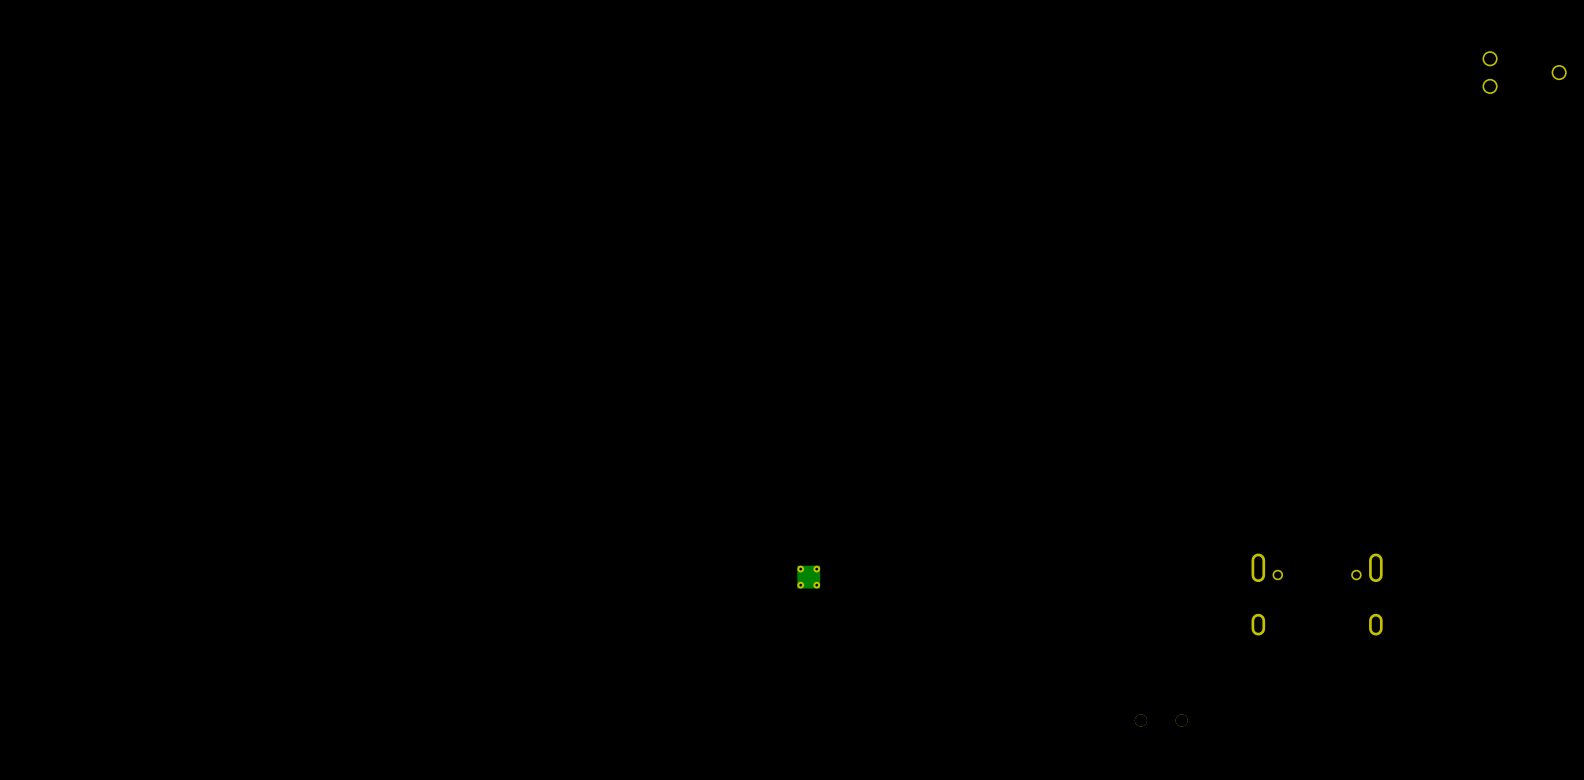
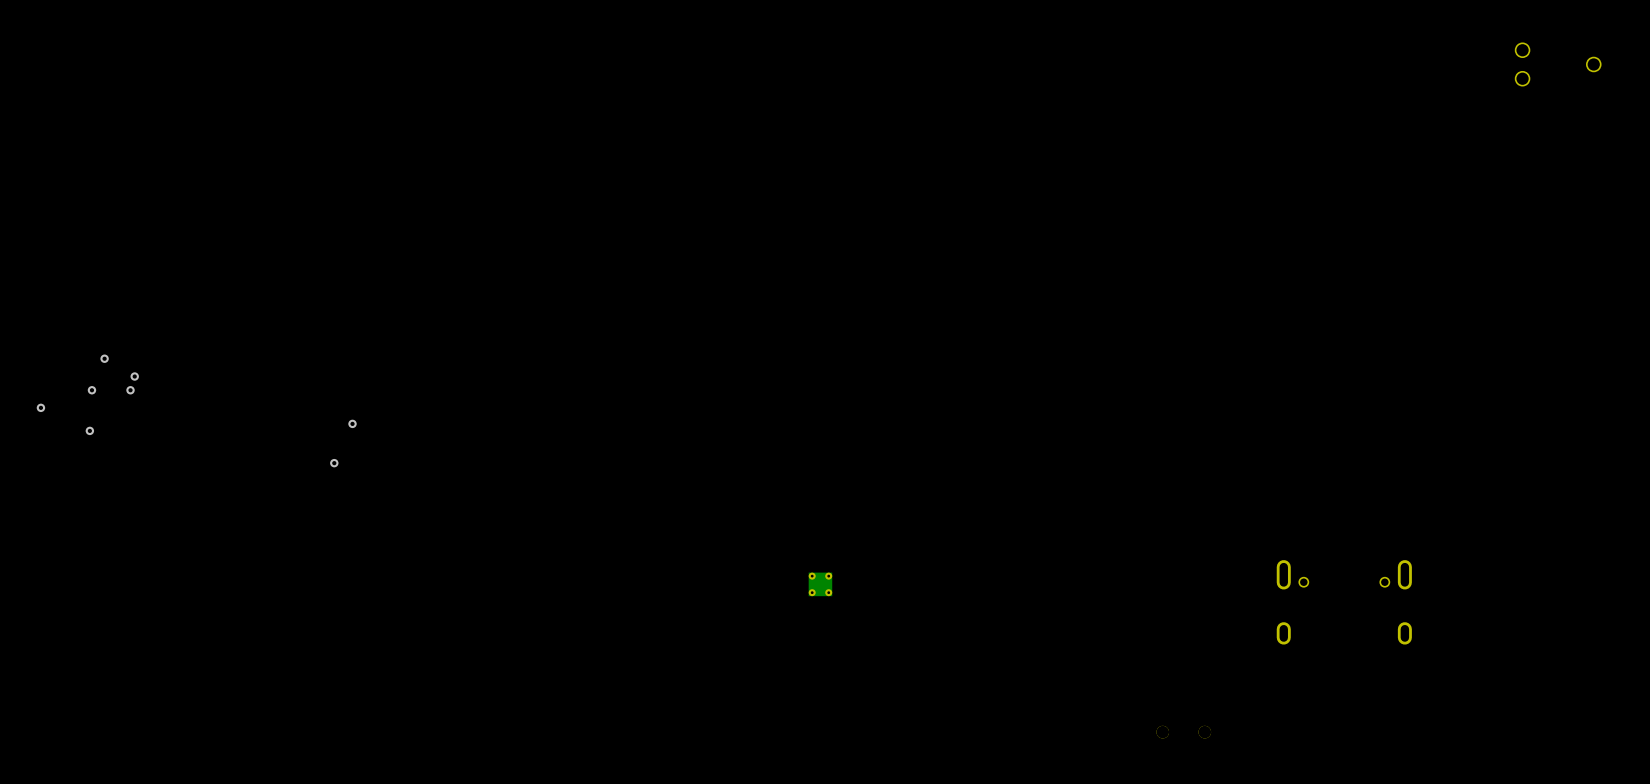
via: none -> (104, 358)
via: none -> (134, 376)
via: none -> (91, 390)
via: none -> (130, 390)
via: none -> (40, 407)
via: none -> (352, 423)
via: none -> (89, 430)
via: none -> (334, 463)

